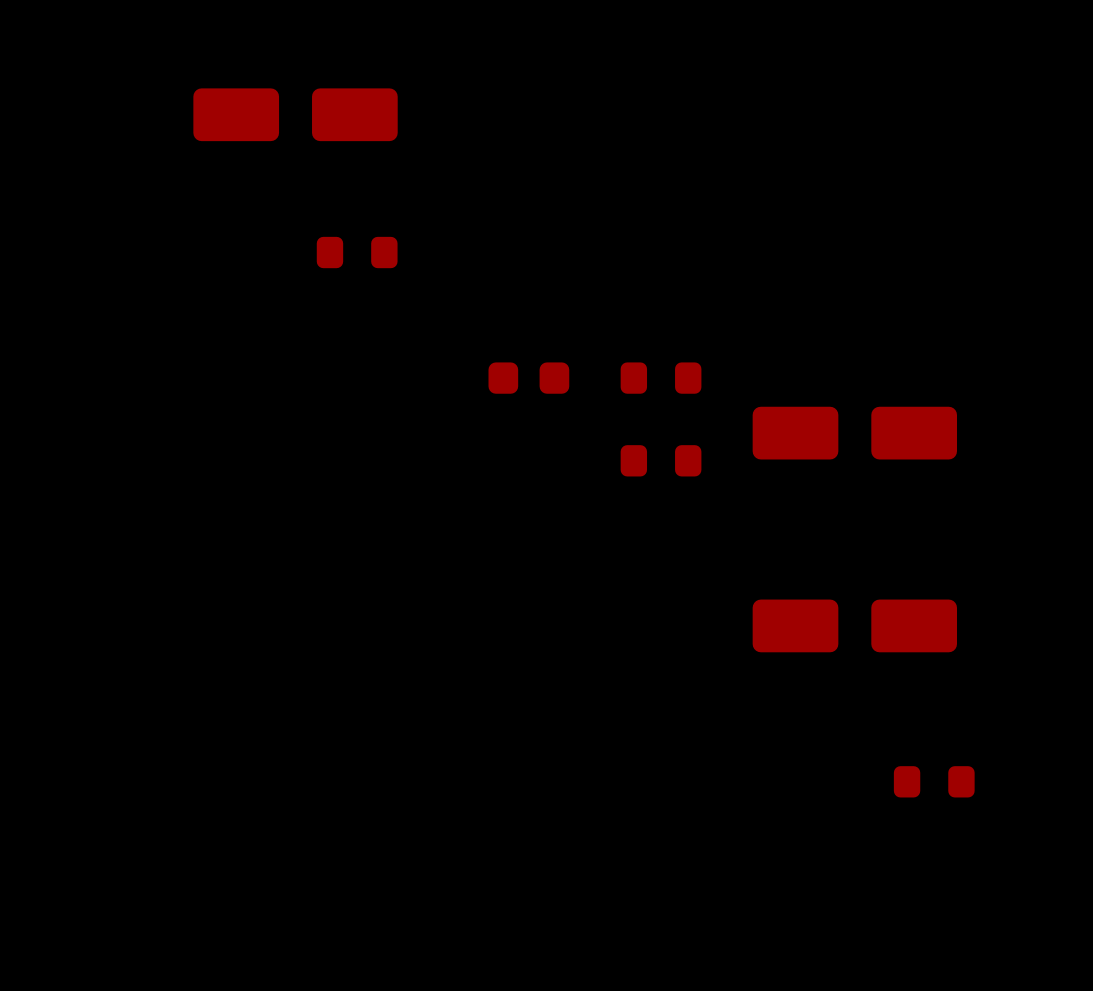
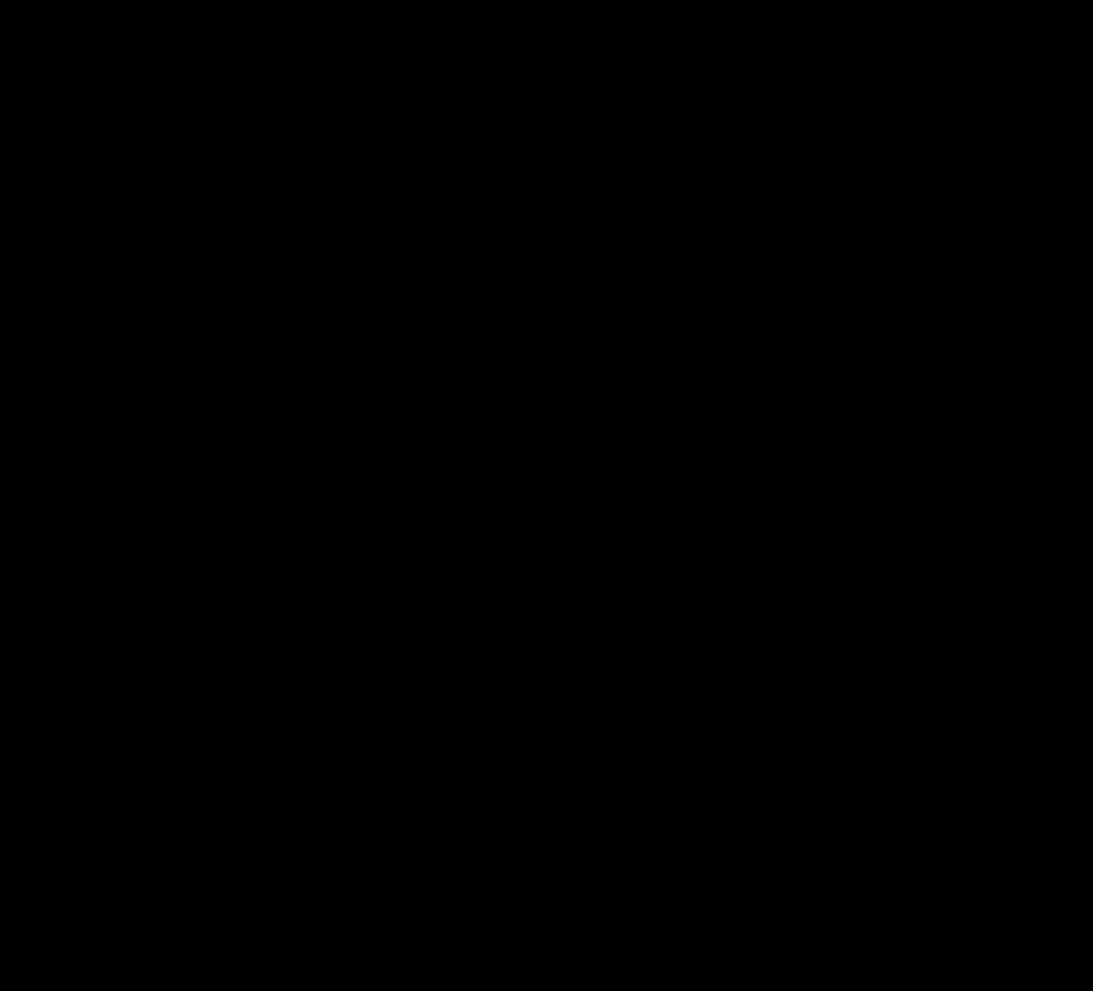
part: (295, 114) -> none
part: (357, 252) -> none
part: (528, 378) -> none
part: (661, 378) -> none
part: (854, 433) -> none
part: (661, 460) -> none
part: (854, 625) -> none
part: (934, 781) -> none

